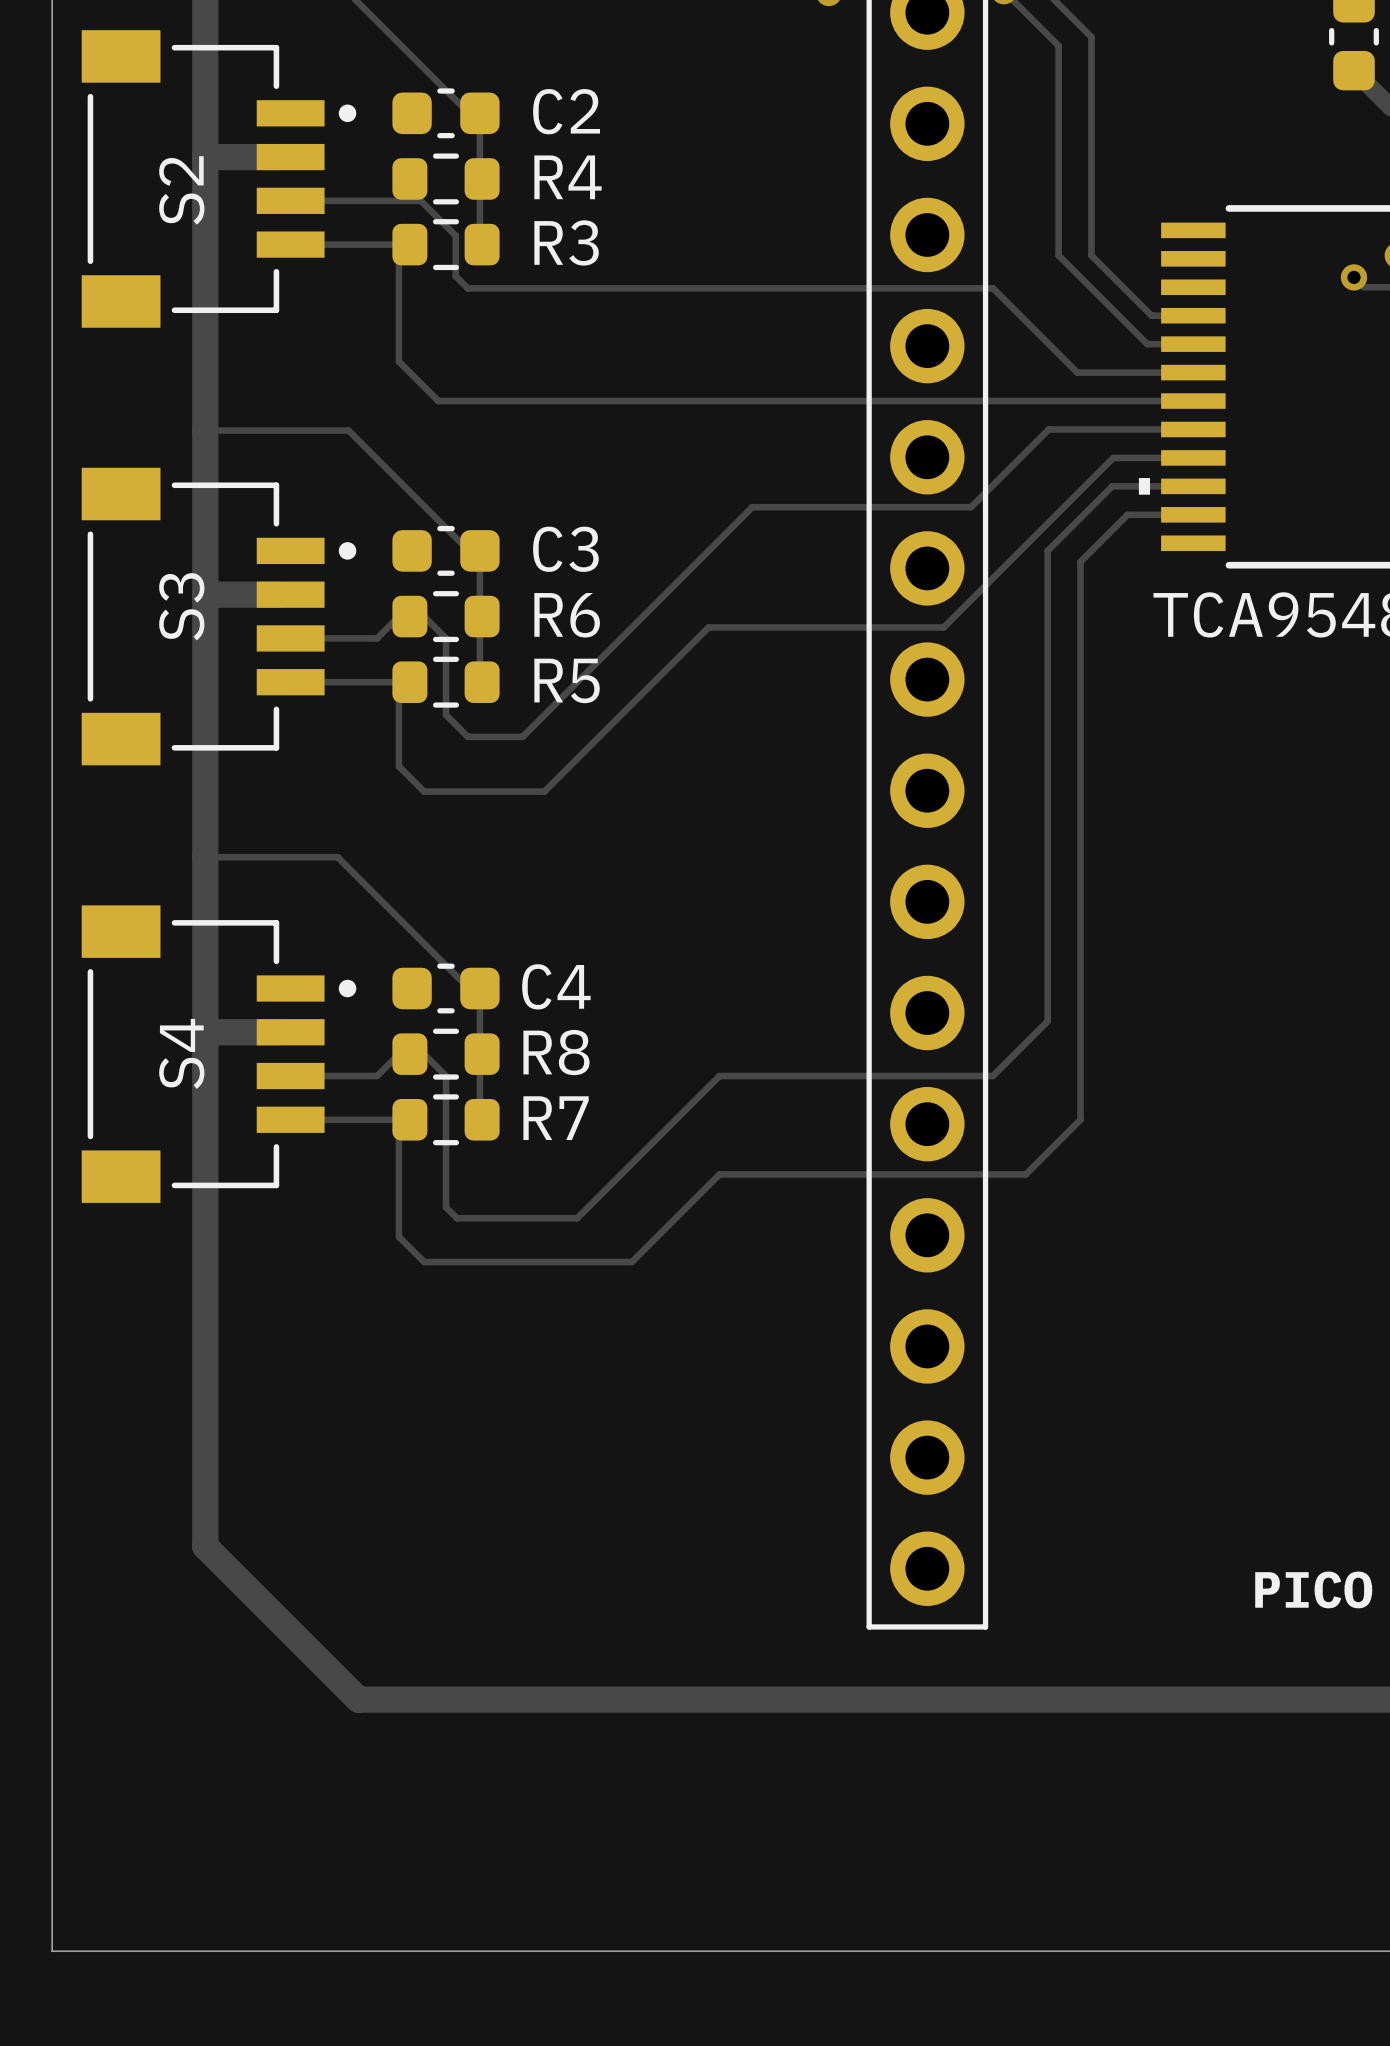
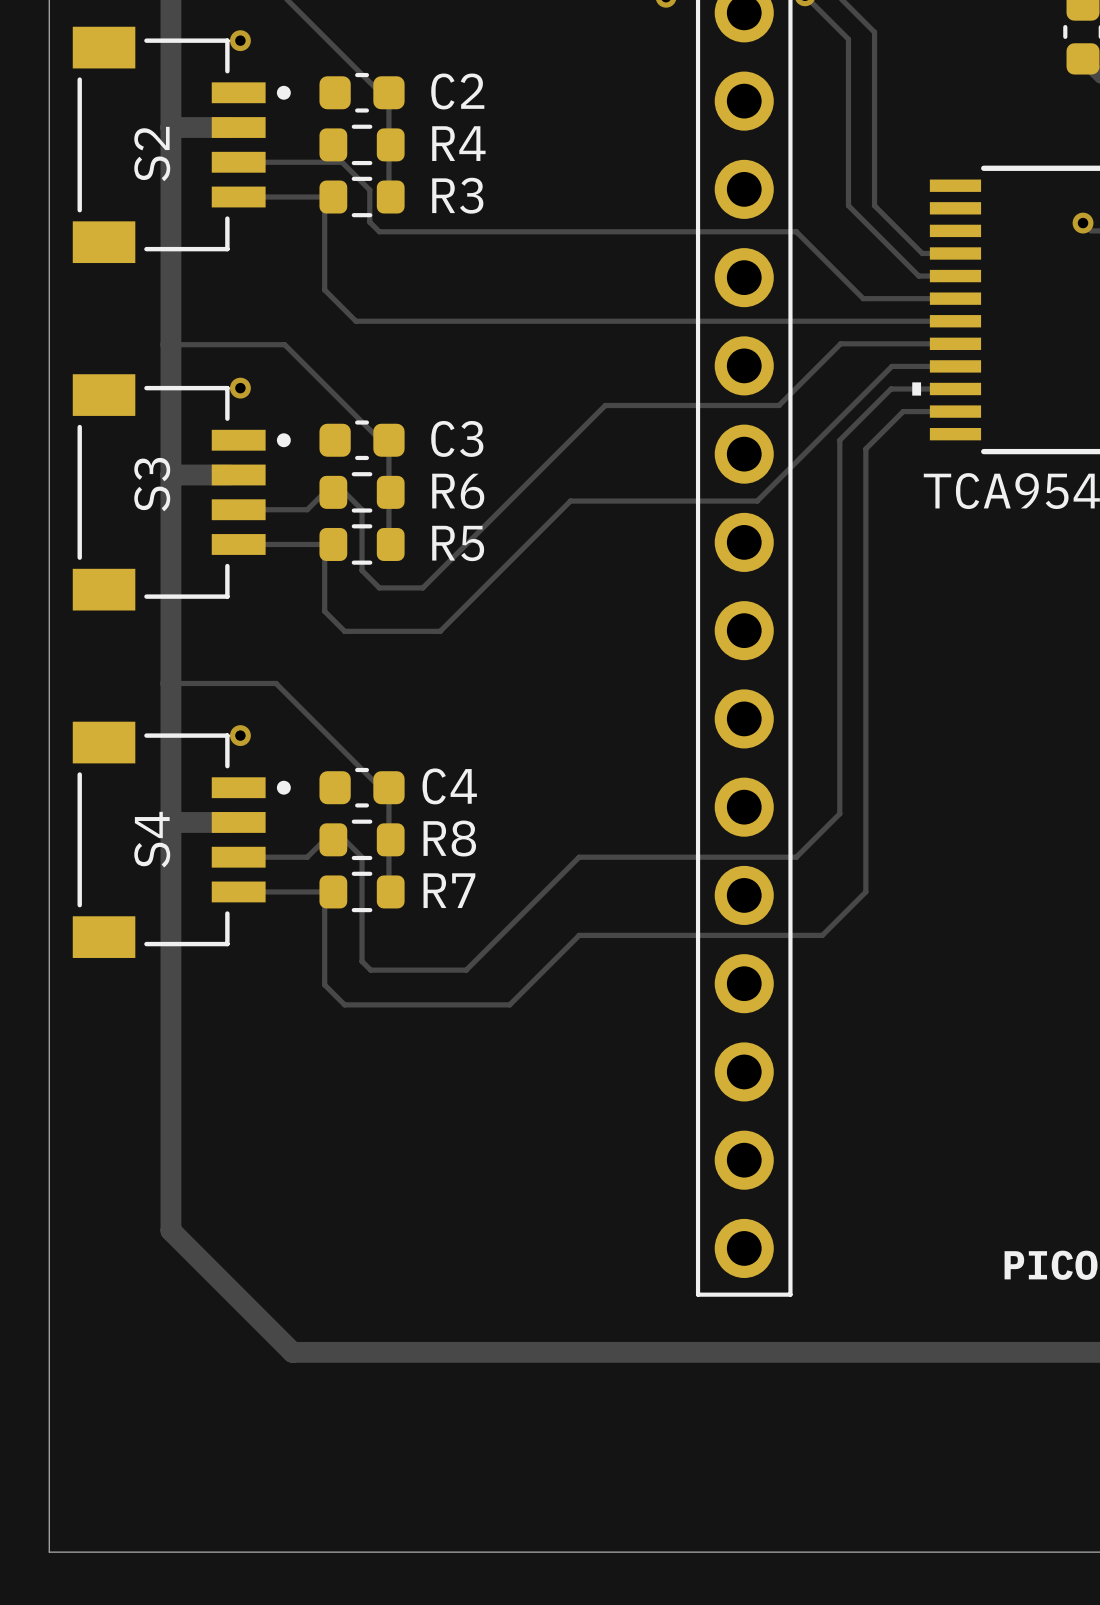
via: none -> (240, 40)
via: none -> (240, 388)
via: none -> (240, 735)

